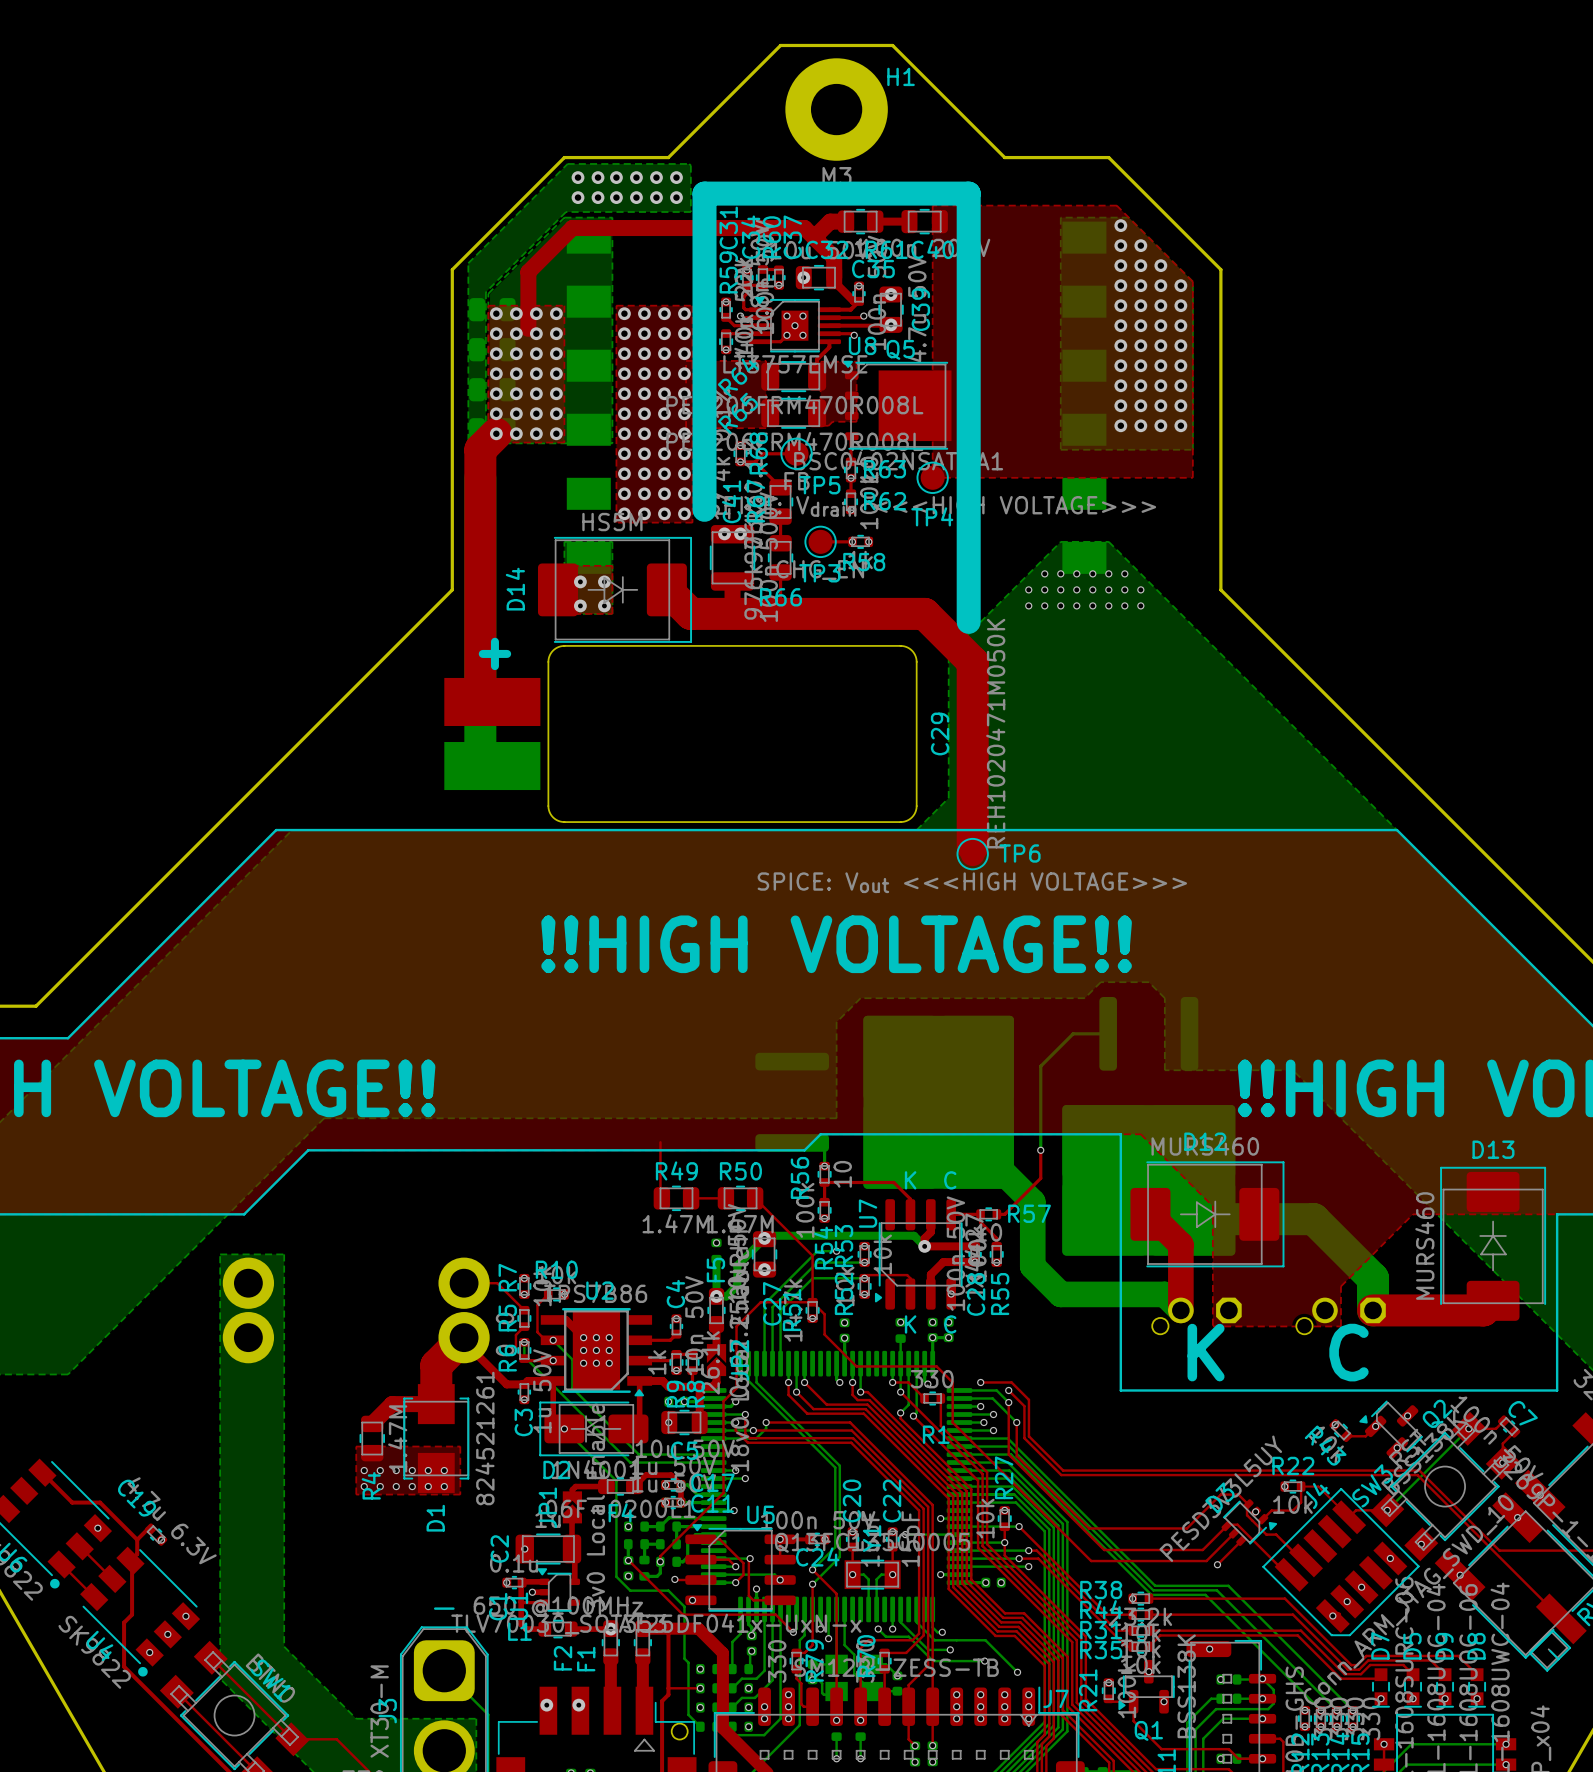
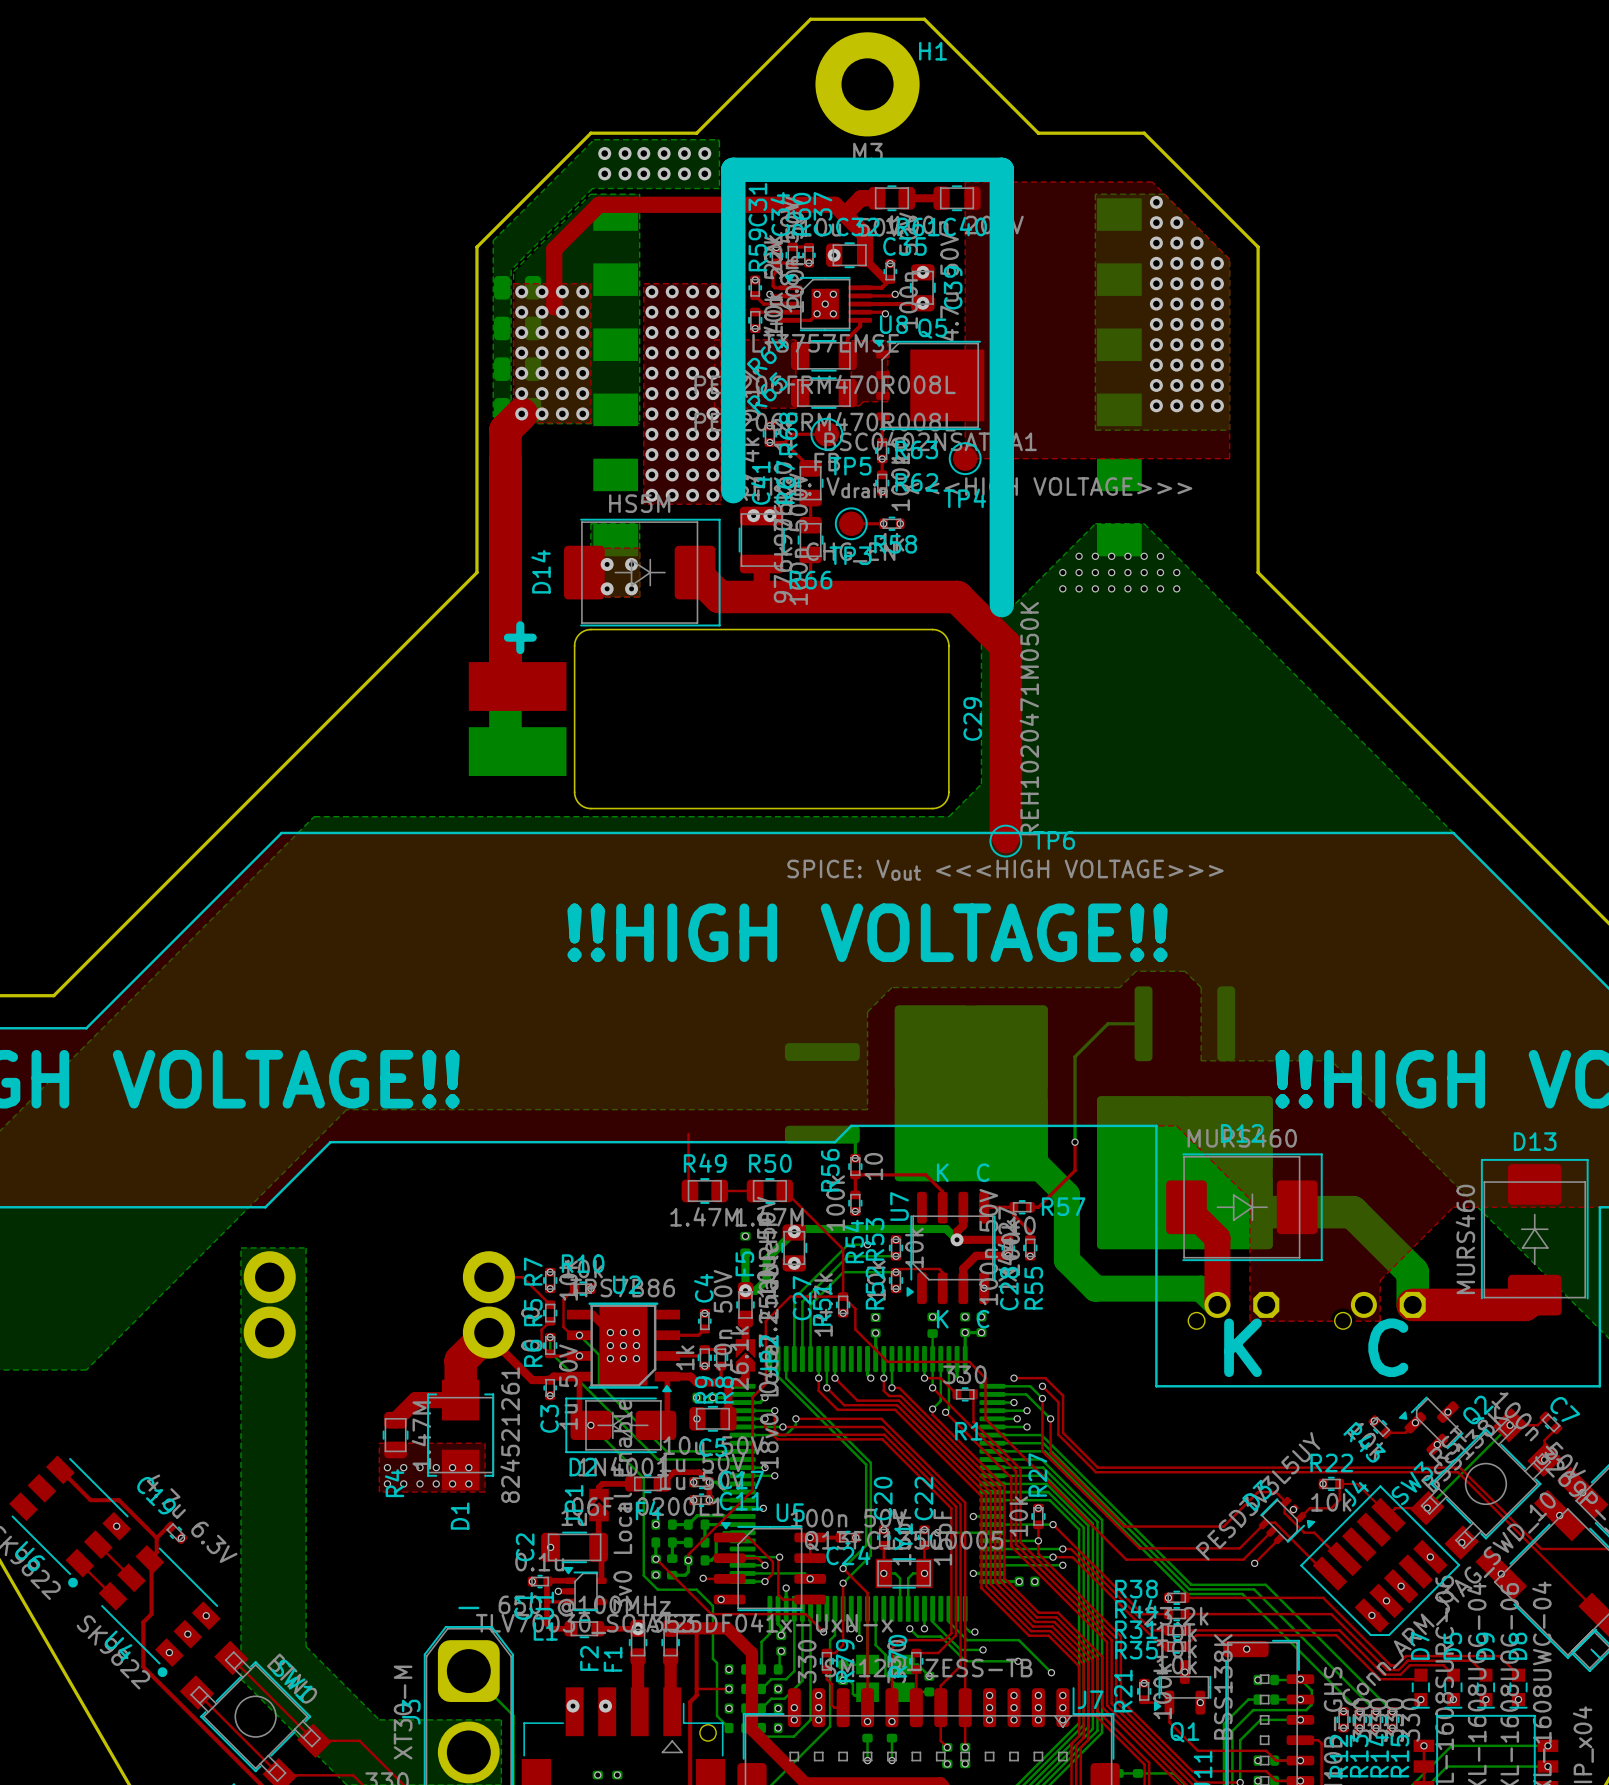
line: (260, 846) (276, 830) (1397, 830) (1413, 846) -> (281, 832) (1453, 832)

